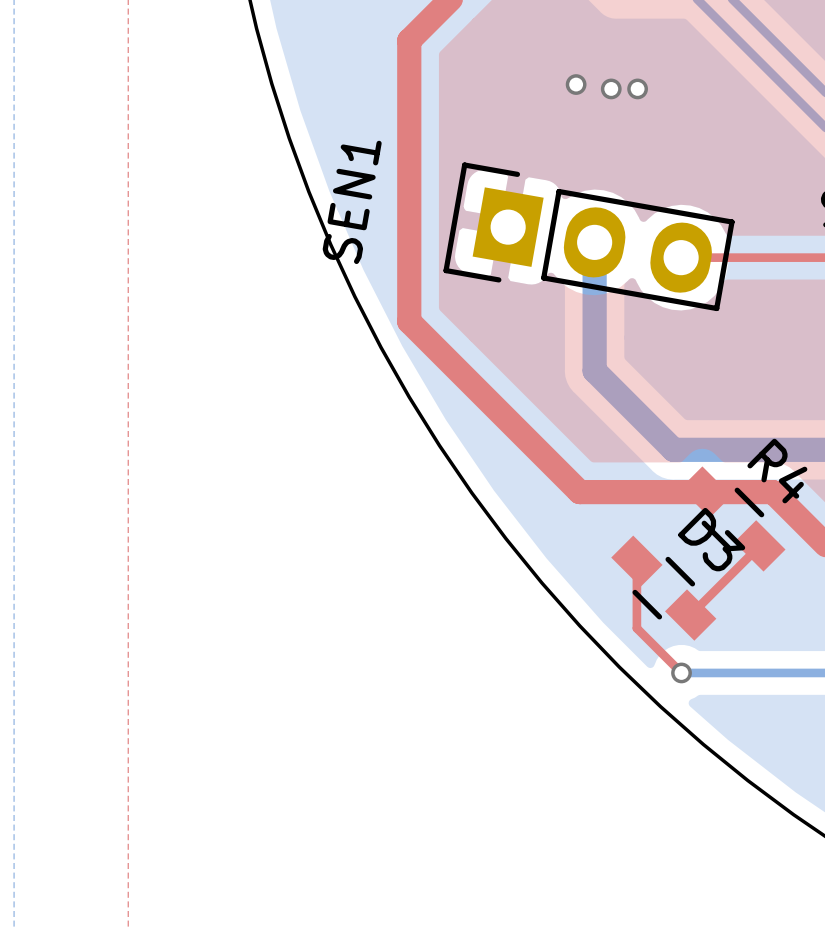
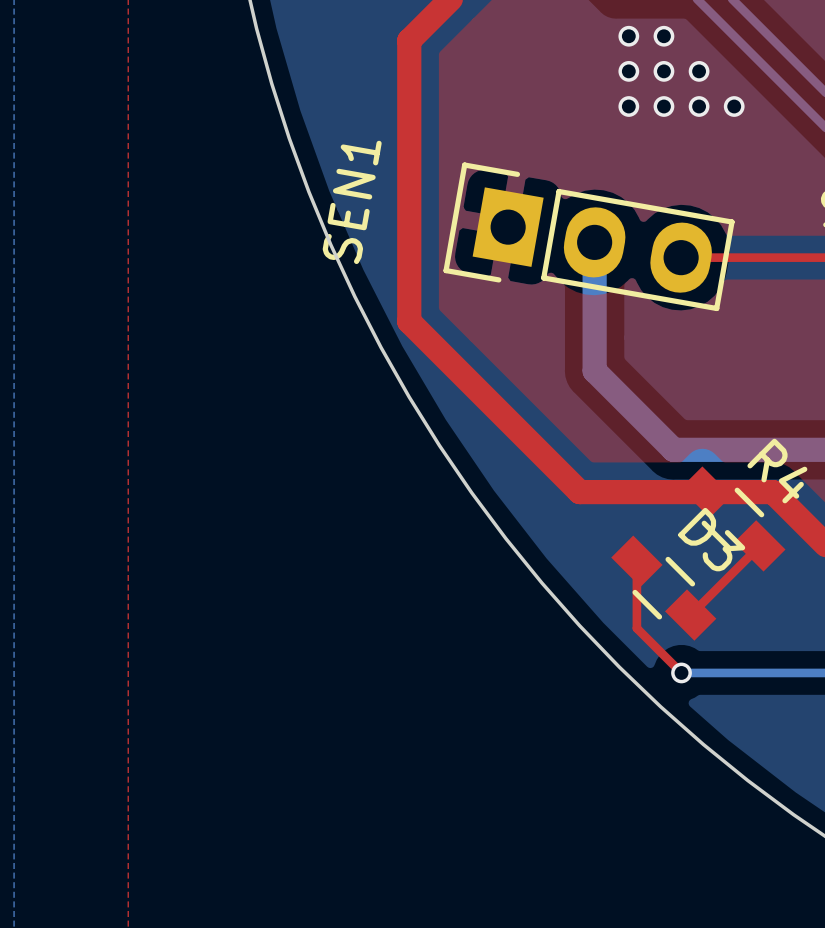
via: none -> (628, 36)
via: none -> (663, 36)
via: none -> (628, 71)
via: none -> (663, 71)
via: none -> (699, 71)
via: (576, 84) -> none
via: (611, 88) -> none
via: (637, 88) -> none
via: none -> (628, 106)
via: none -> (663, 106)
via: none -> (699, 106)
via: none -> (734, 106)

